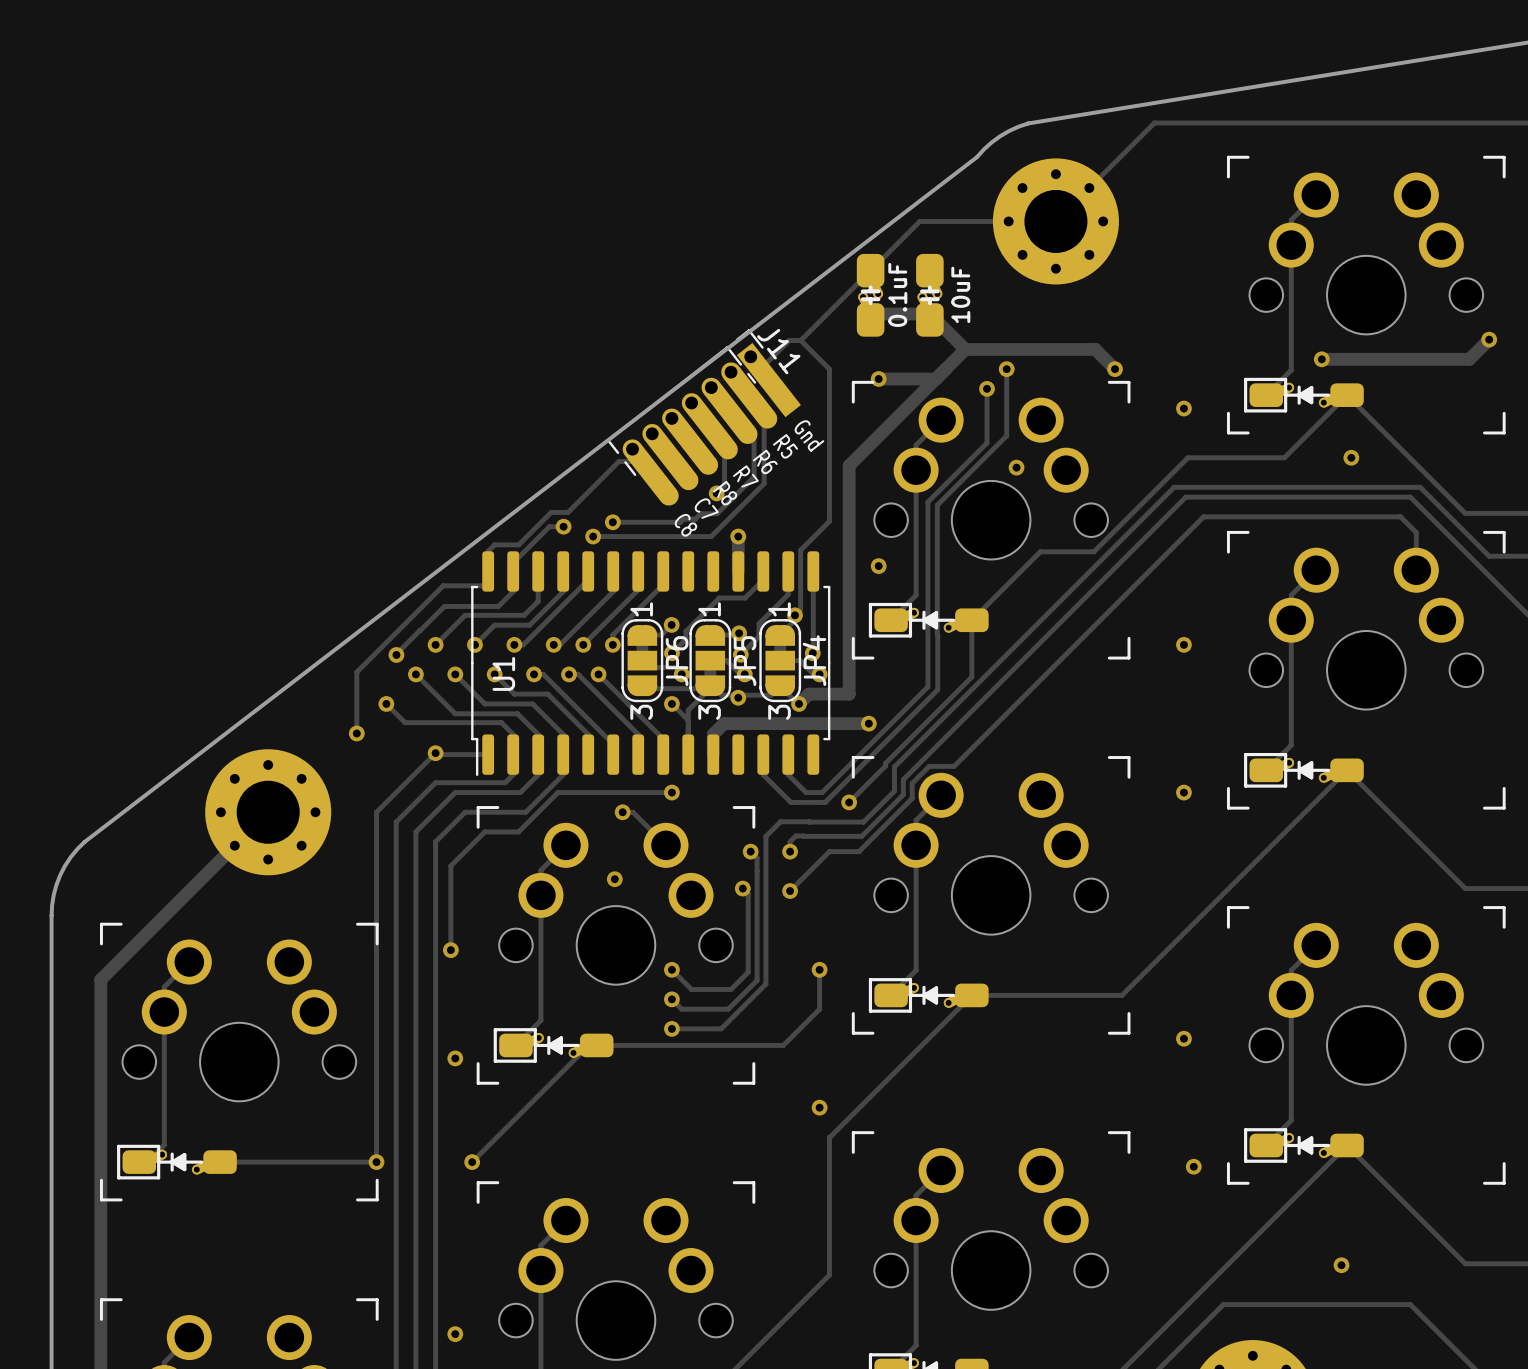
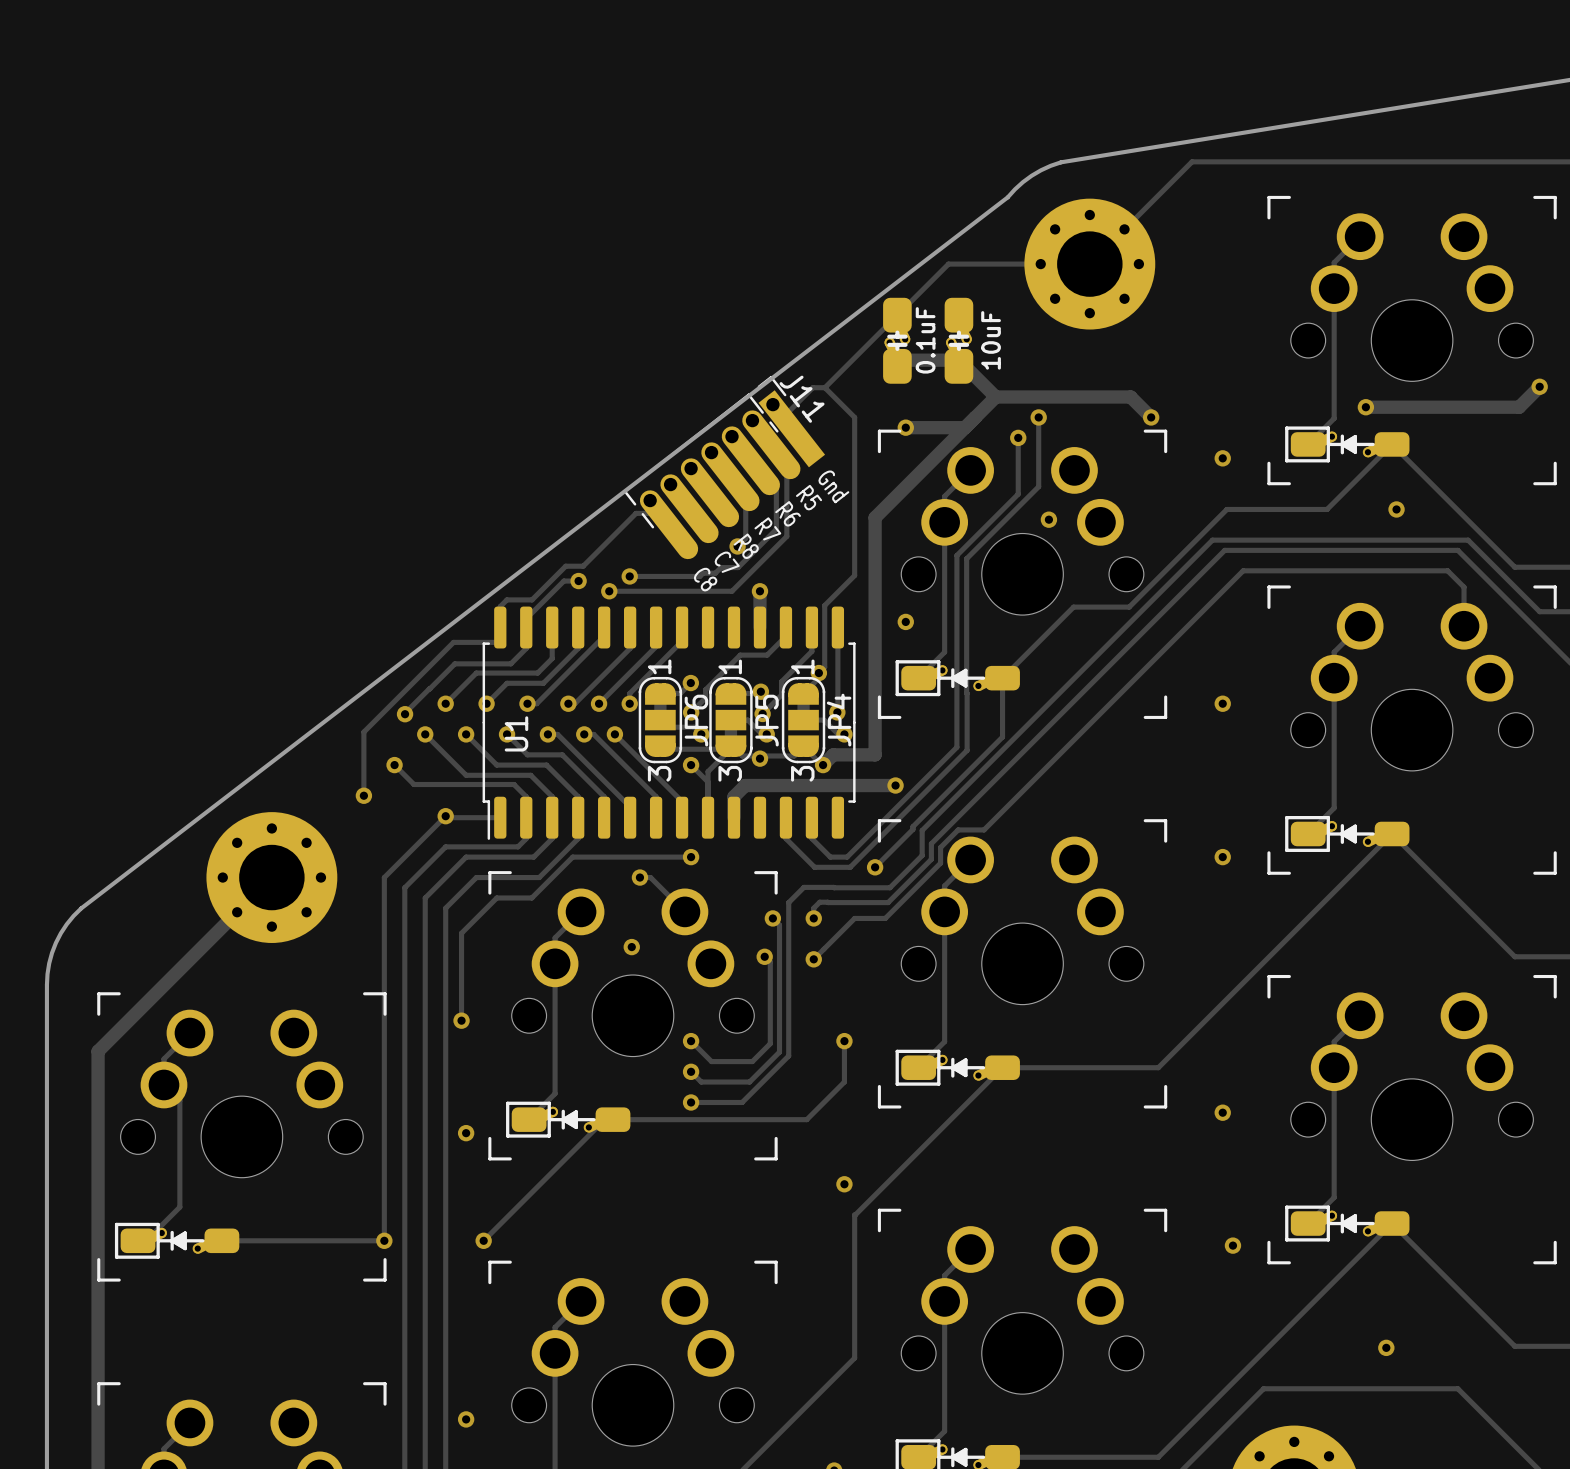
track: (164, 1012) (164, 1144) -> (163, 1084) (179, 1100) (179, 1207) (163, 1223)

